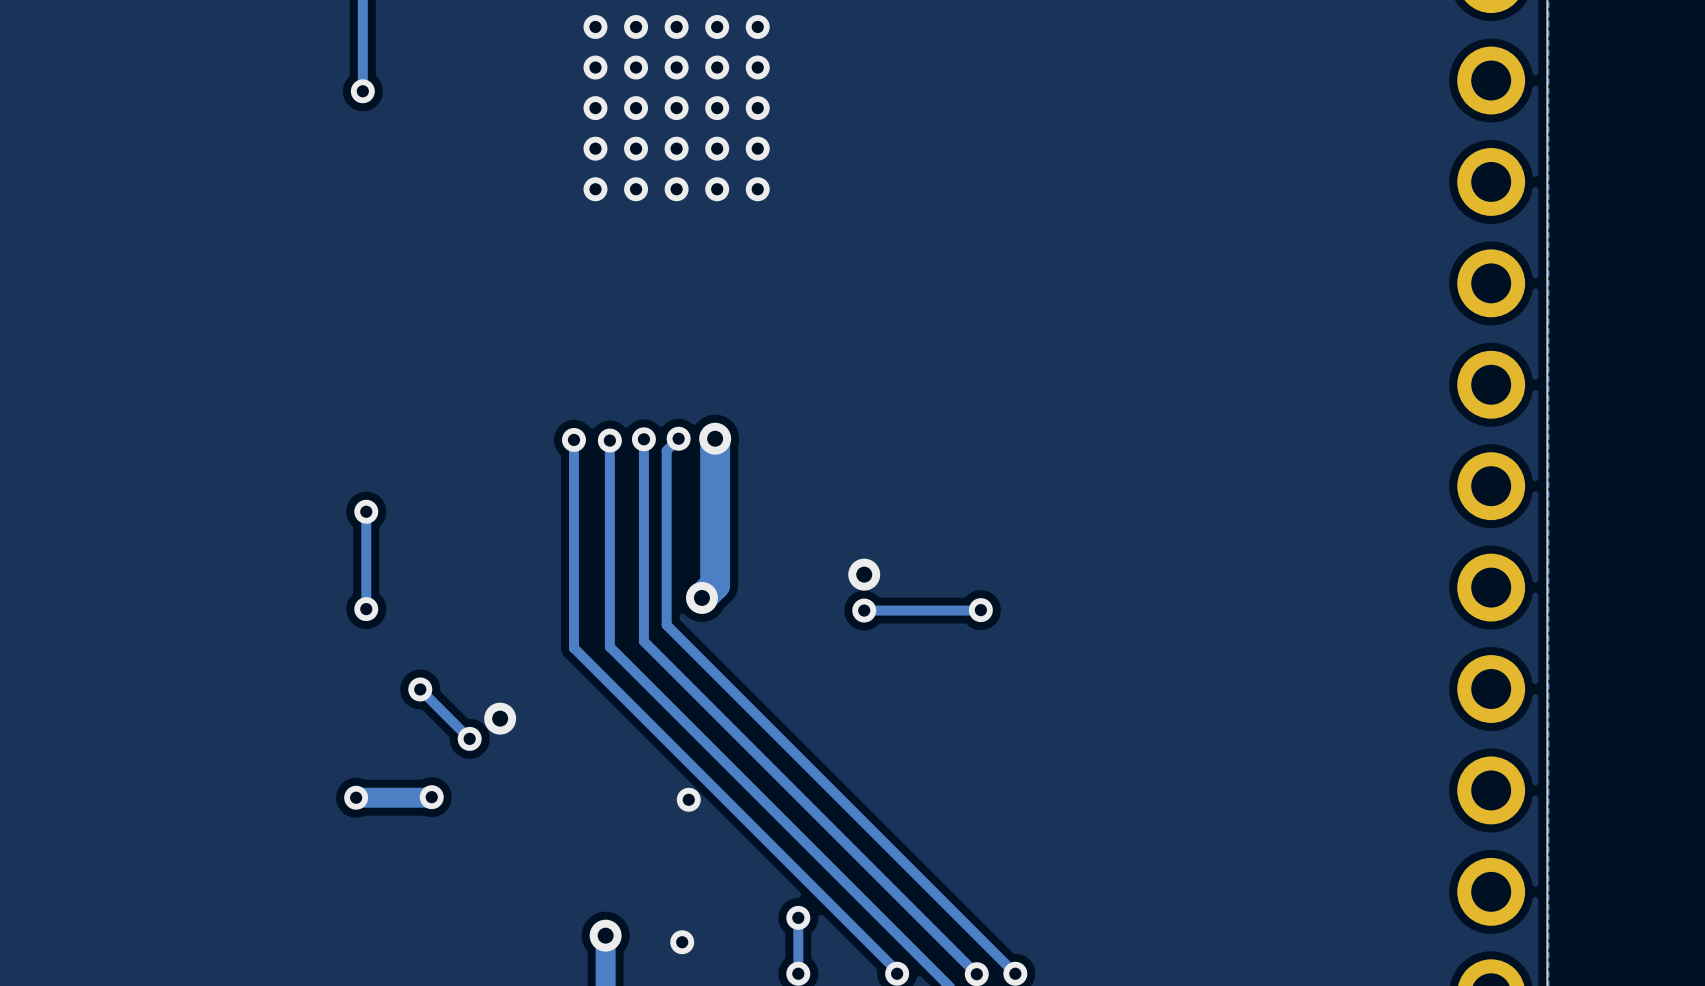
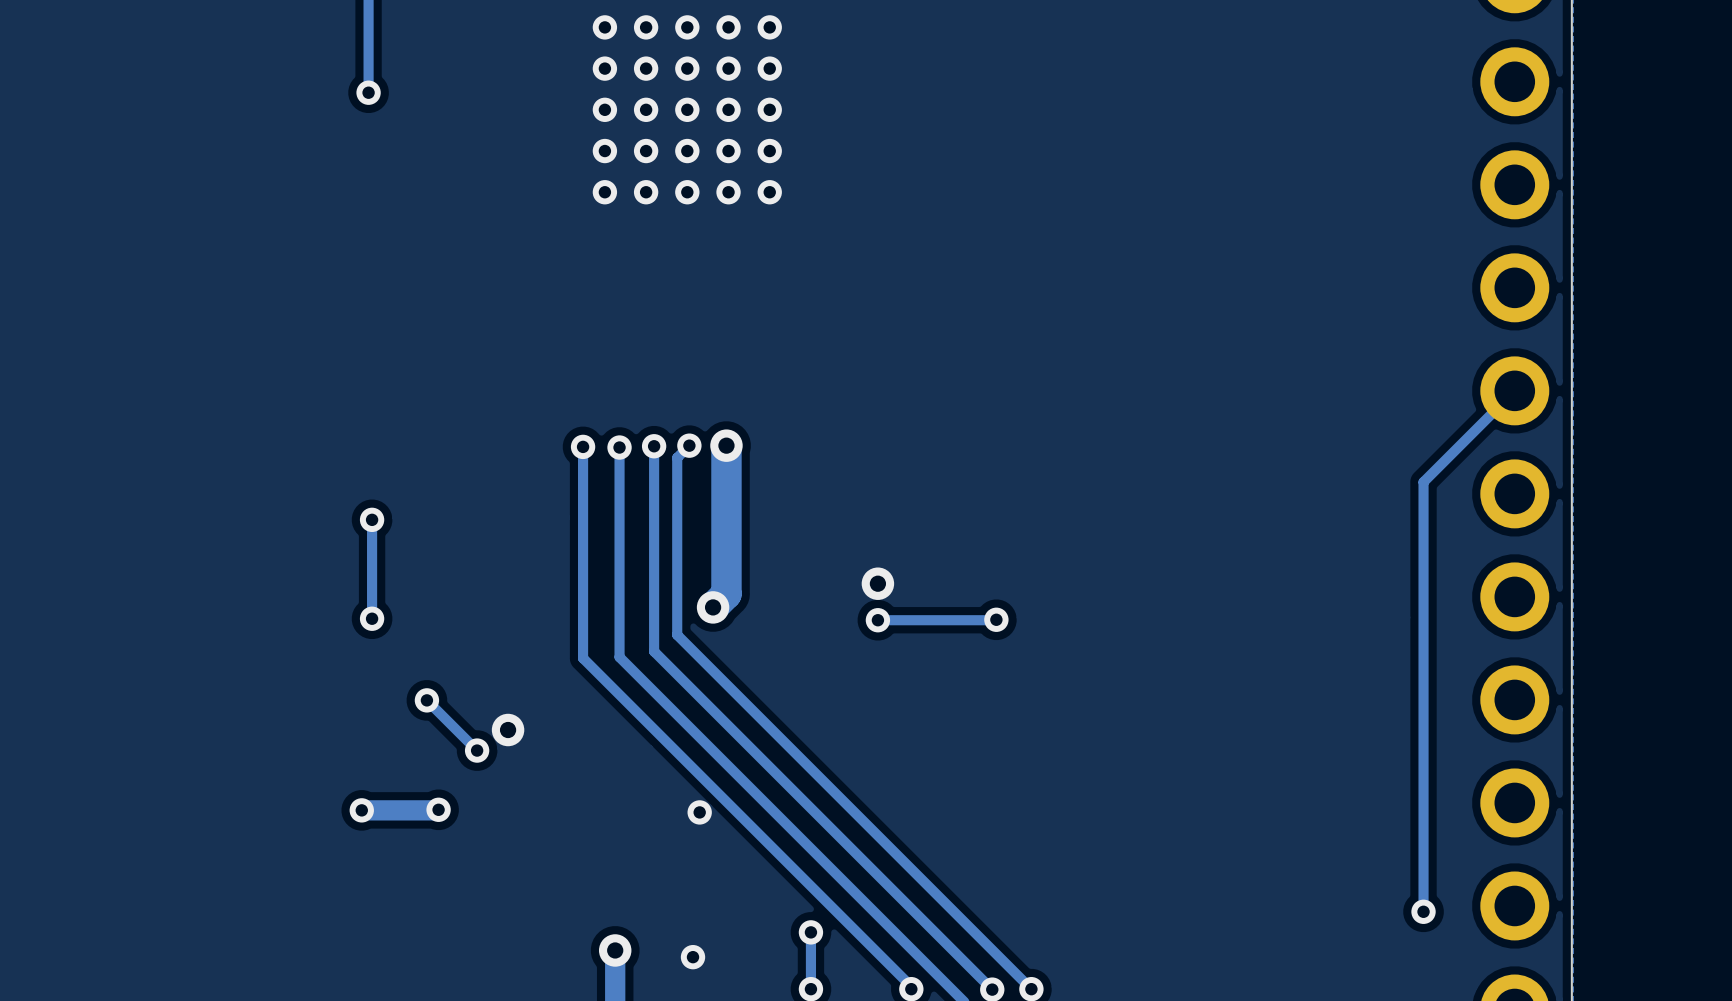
track: none -> (1514, 390) (1423, 482) (1423, 911)
via: none -> (1423, 911)

